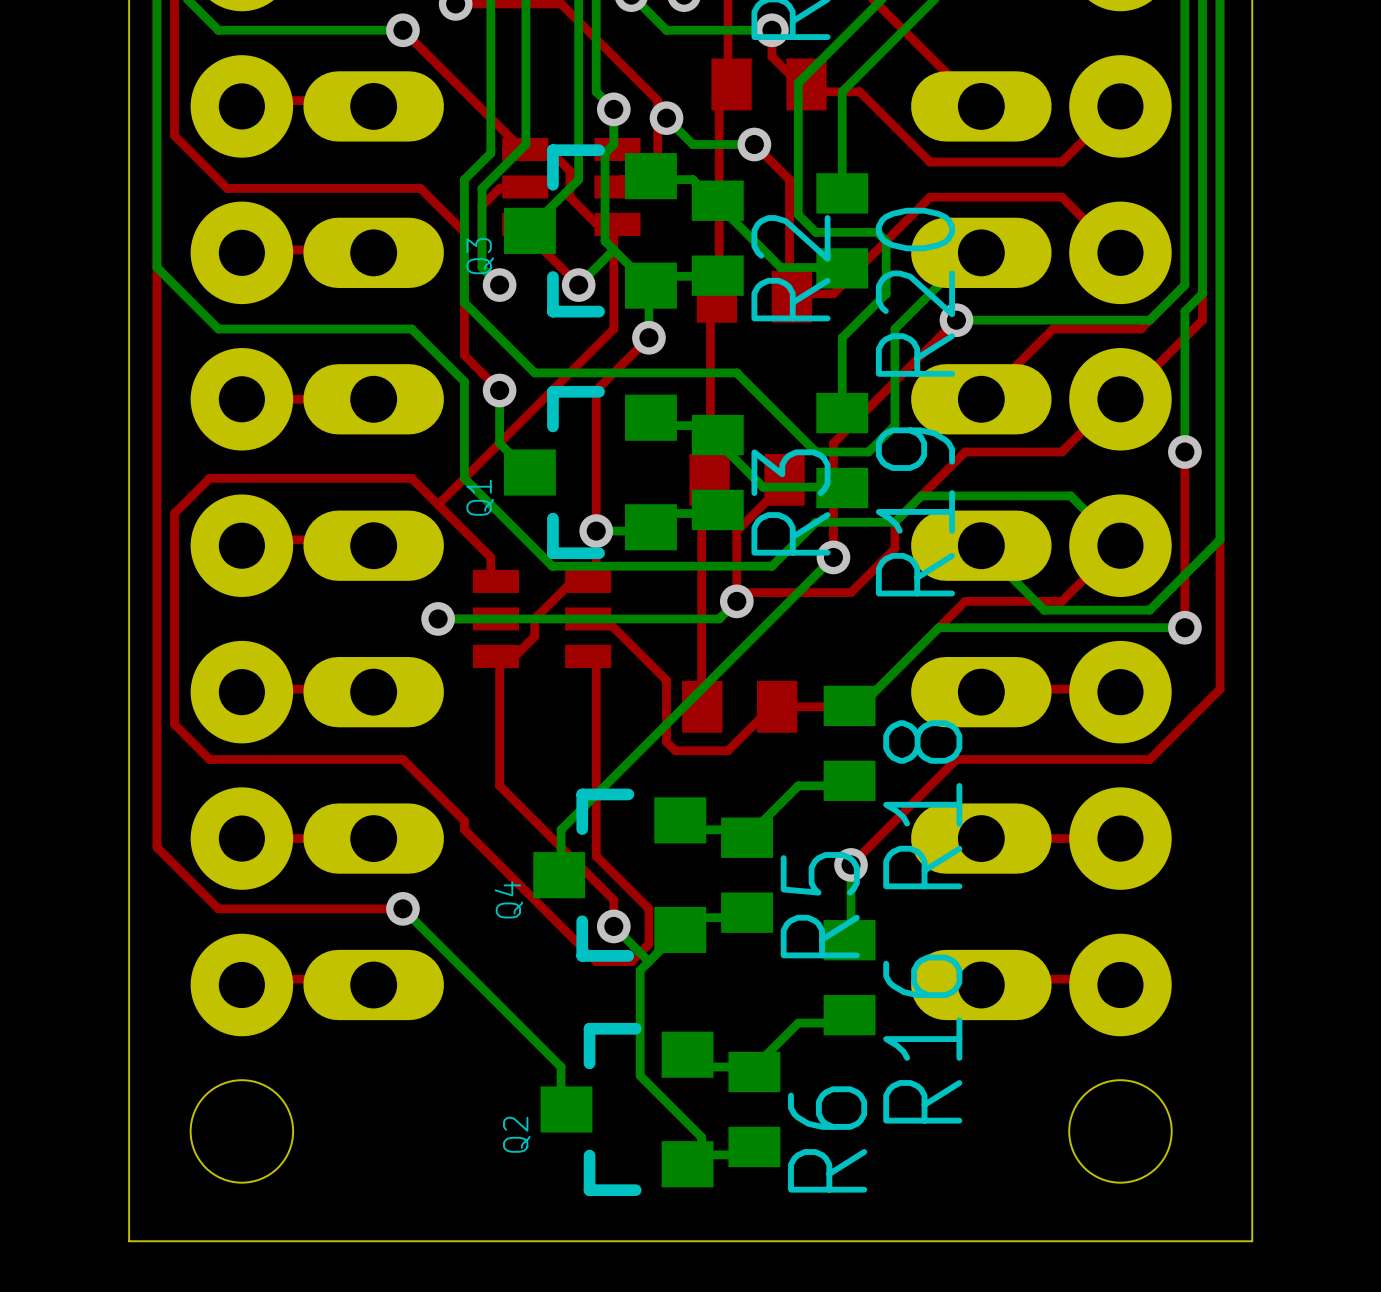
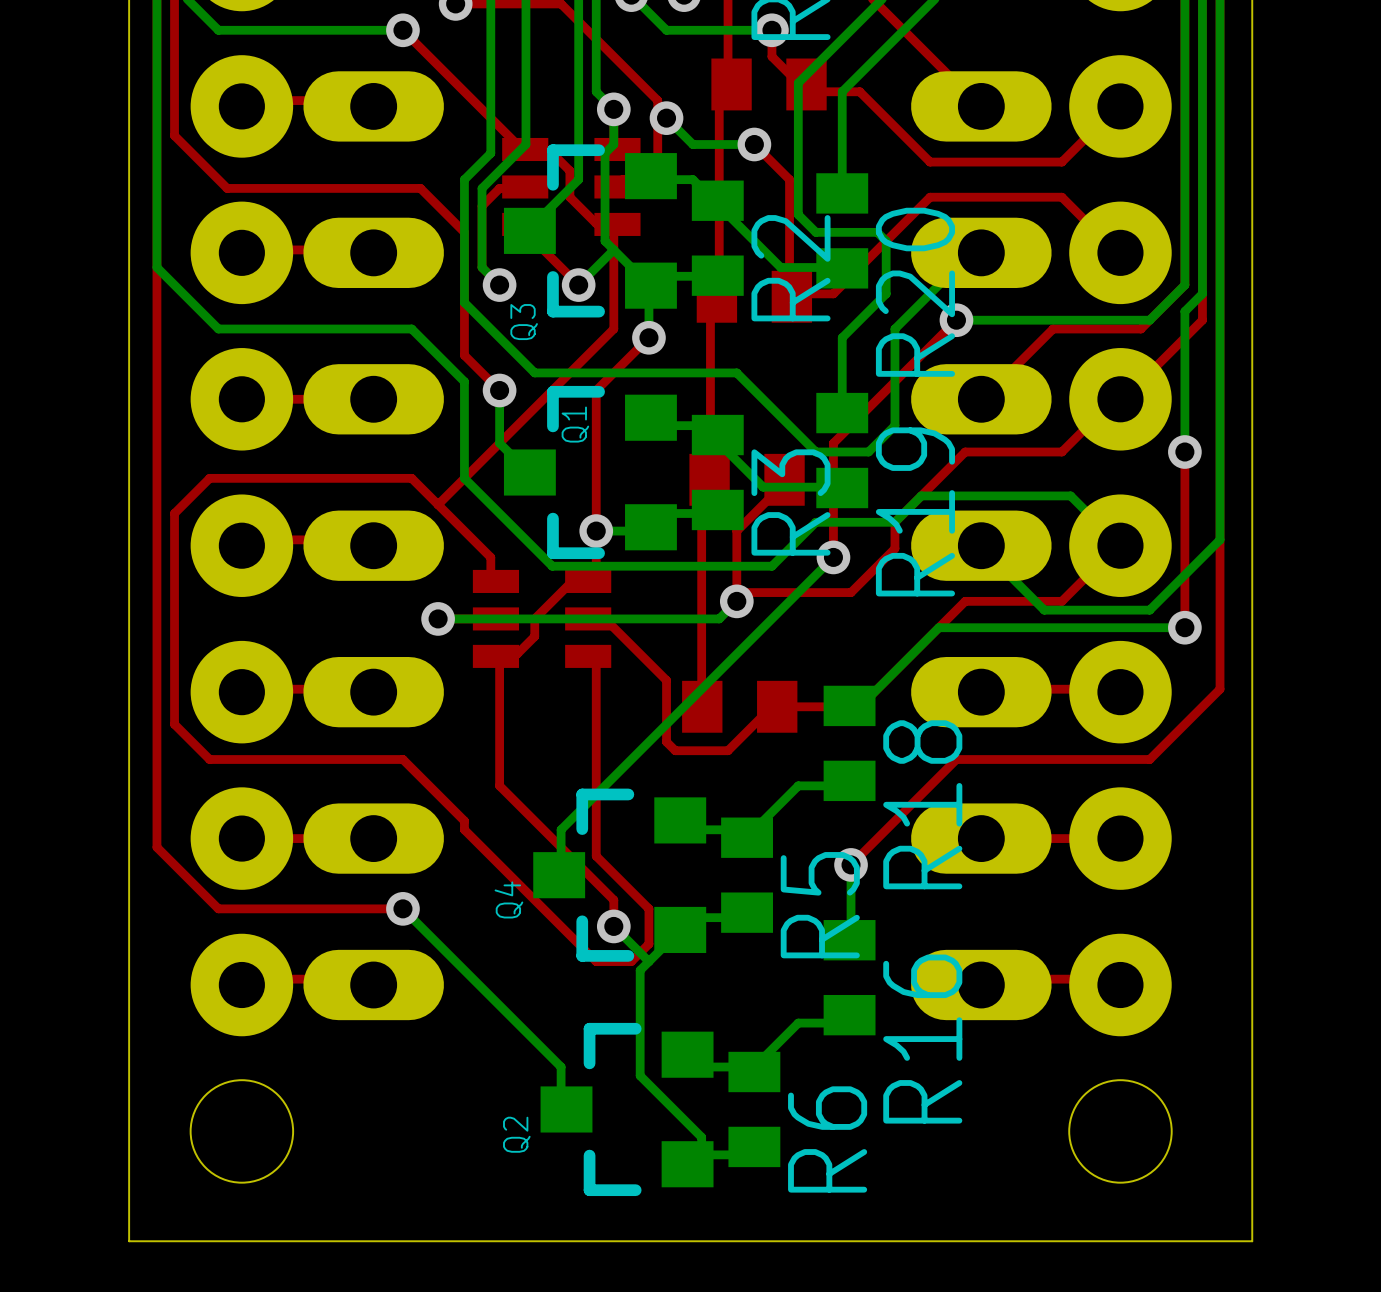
Q3 name position: Q3 (480, 256) -> Q3 (524, 322)
Q1 name position: Q1 (480, 497) -> Q1 (575, 424)

